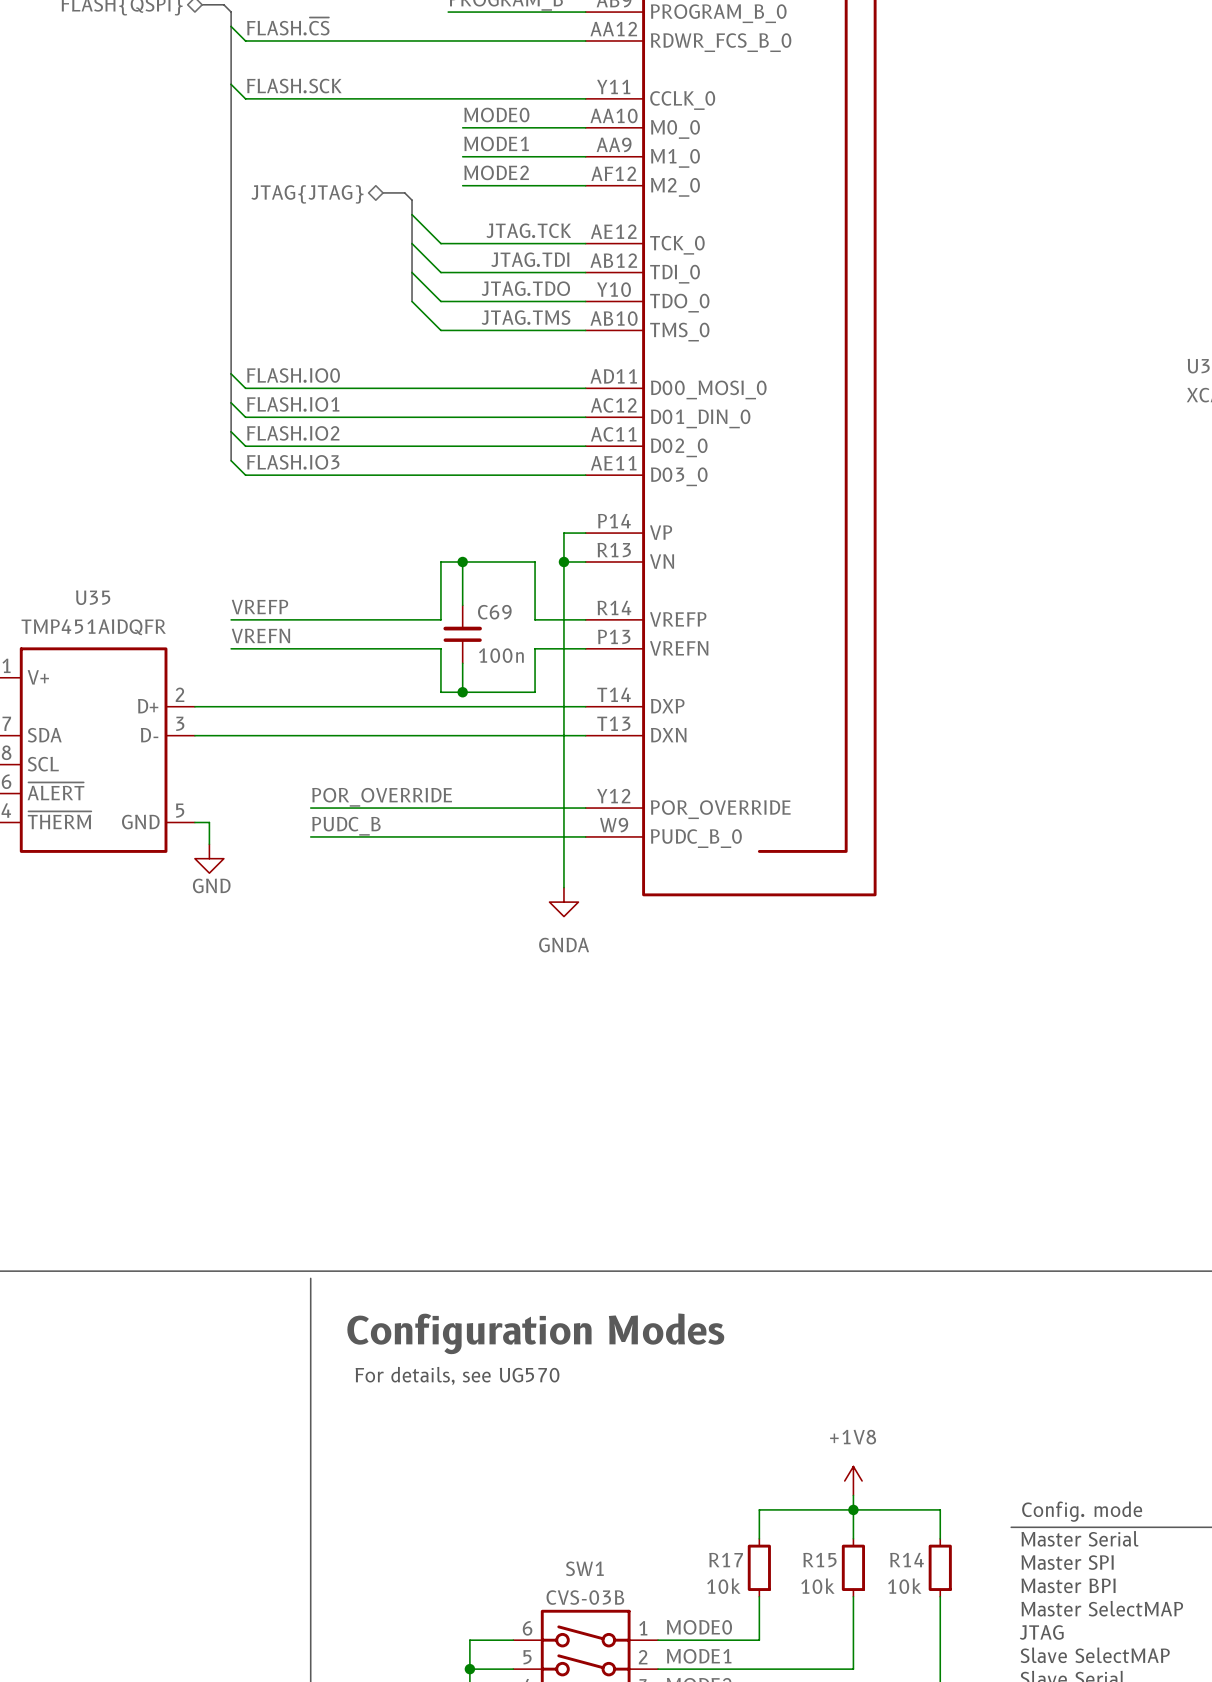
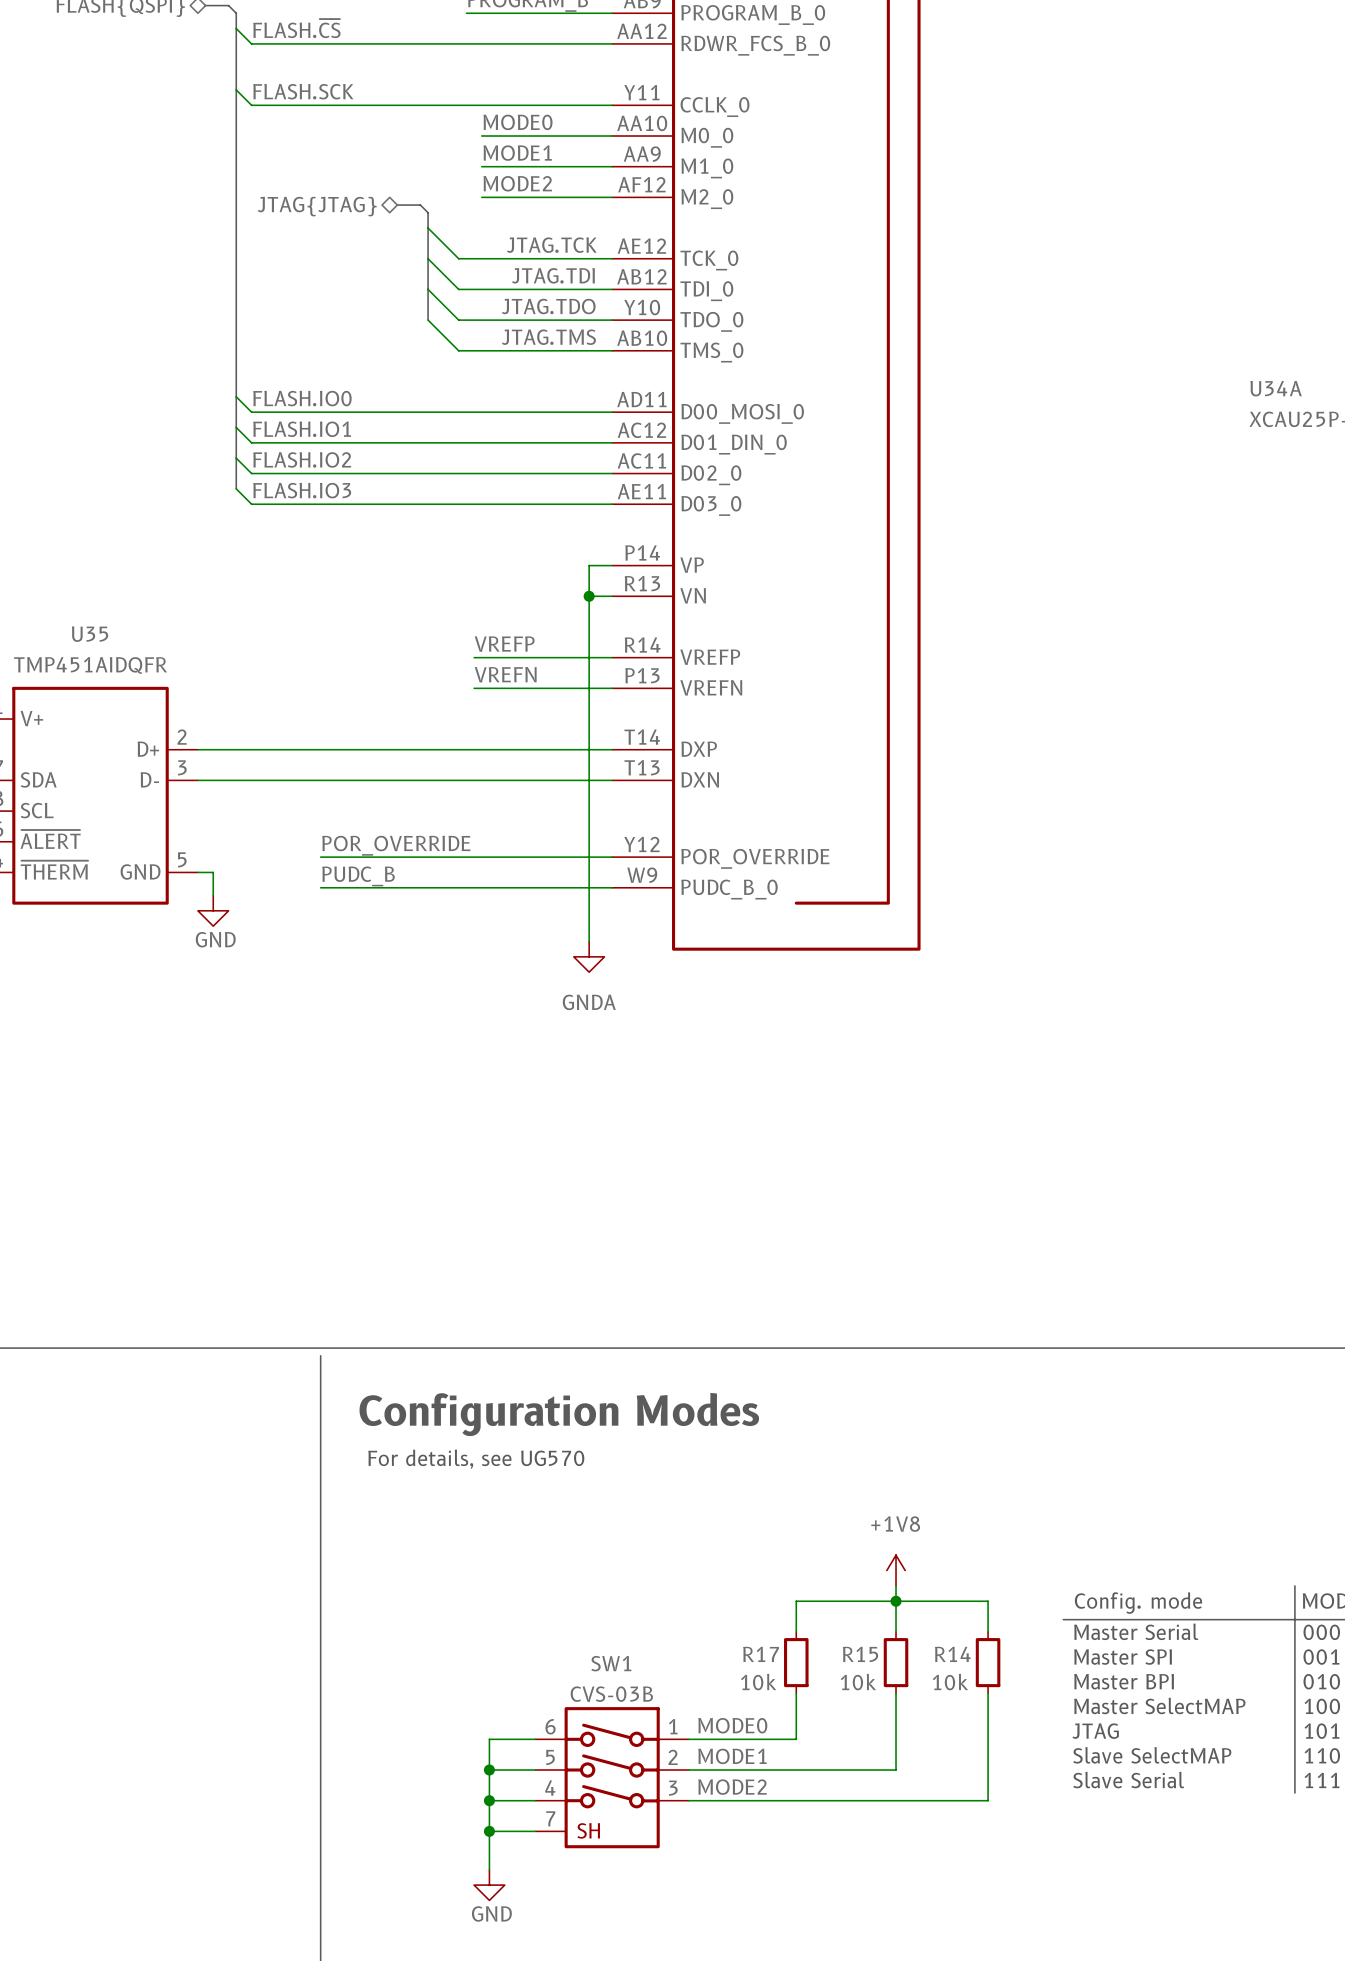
wire: (462, 561) (462, 605) -> none
junction: (462, 561) -> none
label position: VREFP (259, 607) -> VREFP (504, 644)
wire: (231, 619) (440, 619) (440, 561) (535, 561) (535, 619) -> (474, 657) (558, 657)
C69: (462, 634) -> none
label position: VREFN (260, 636) -> VREFN (505, 674)
wire: (231, 648) (440, 648) (440, 692) (535, 692) (535, 648) -> (474, 688) (558, 688)
wire: (462, 663) (462, 692) -> none
junction: (462, 692) -> none

